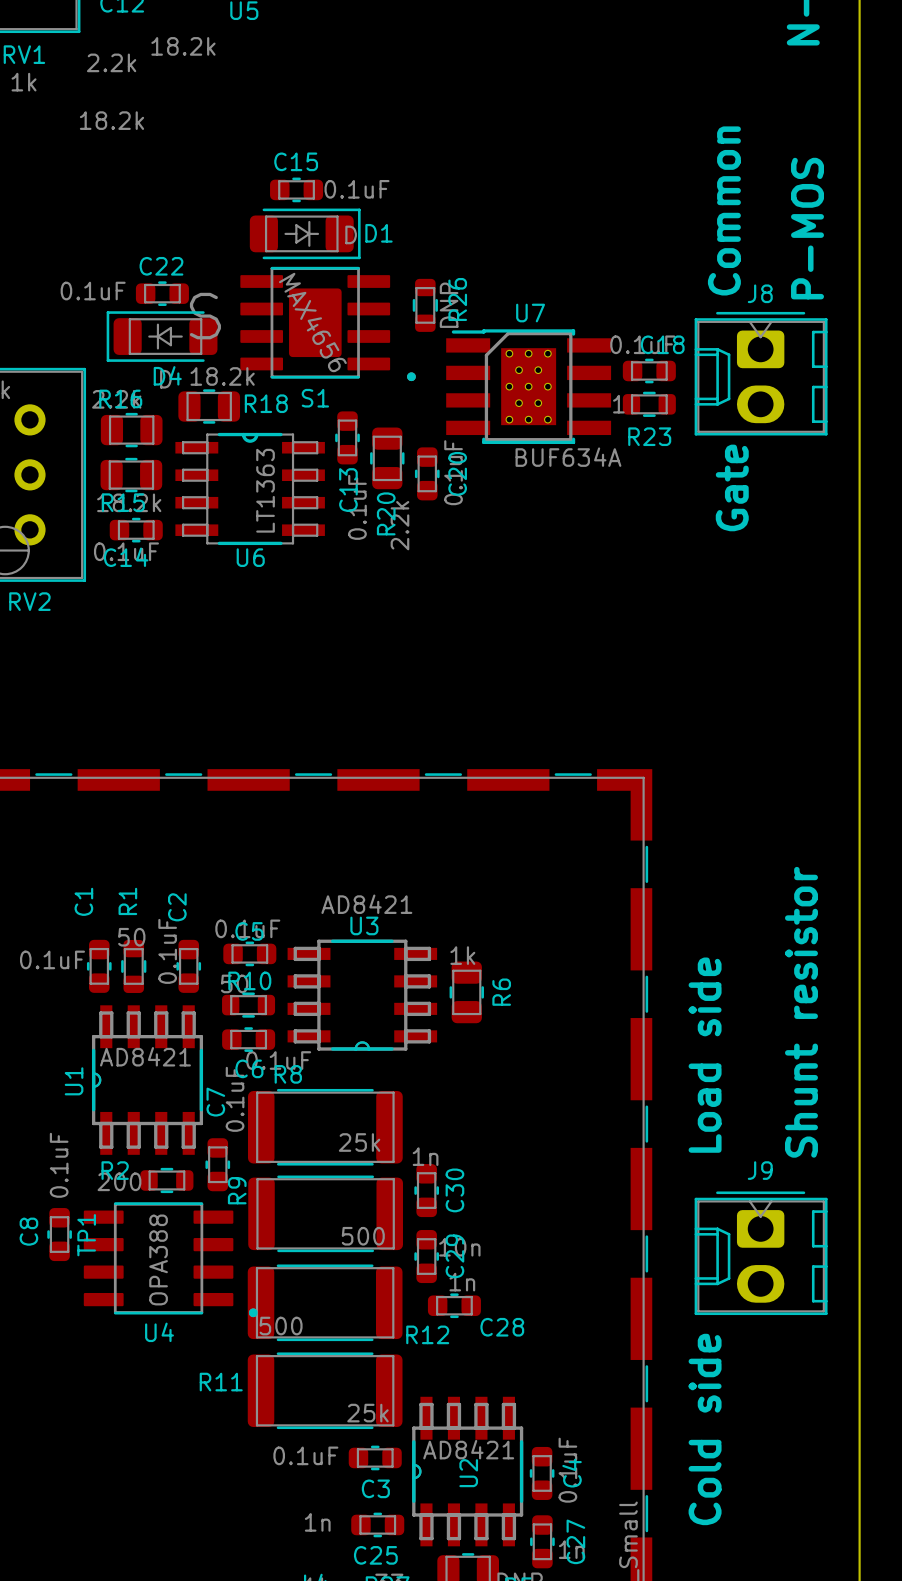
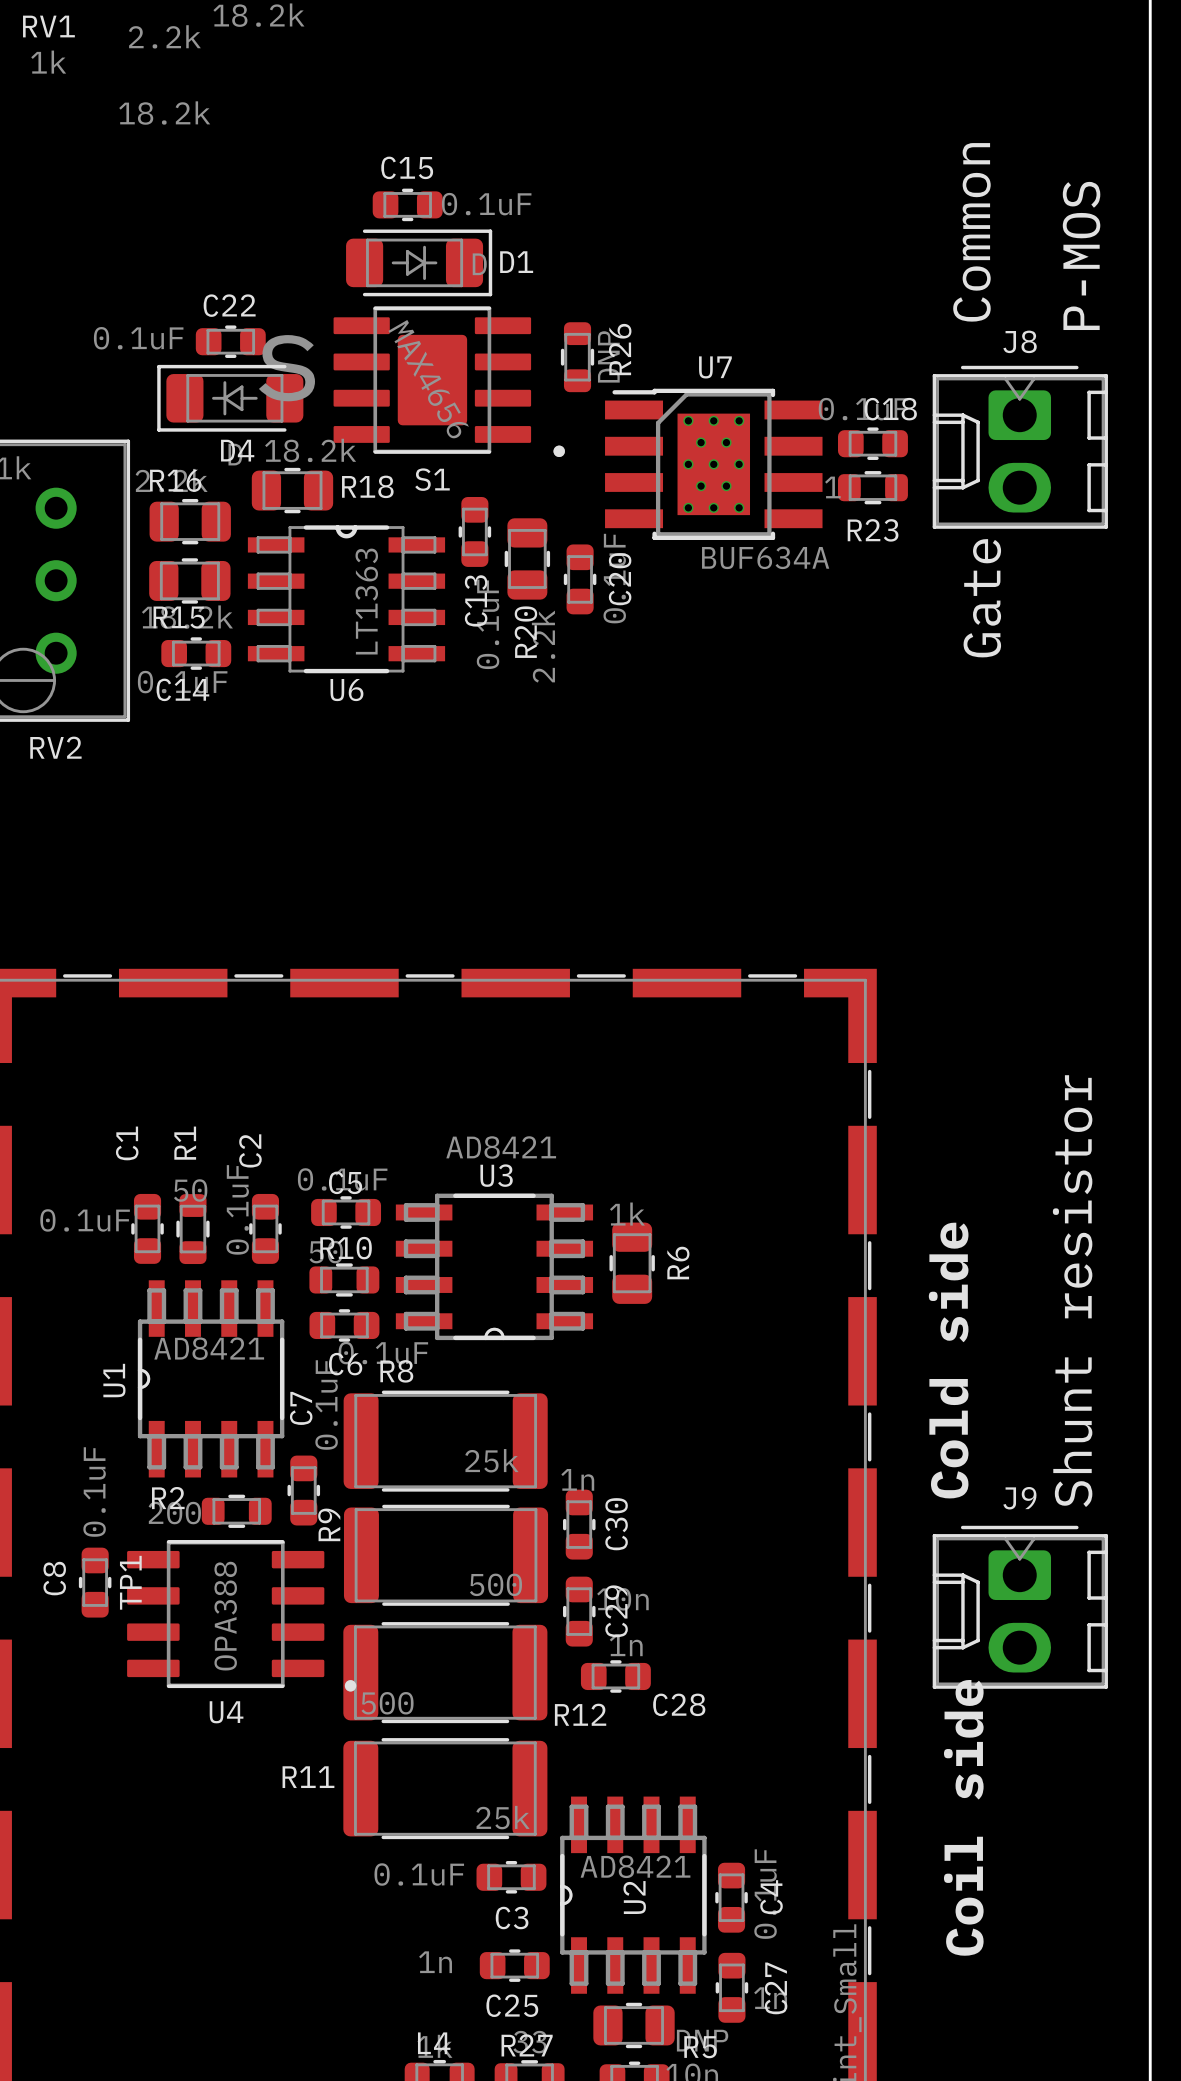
text: Load side (705, 1055) -> Cold side (948, 1360)
text: Cold side (705, 1429) -> Coil side (963, 1817)

